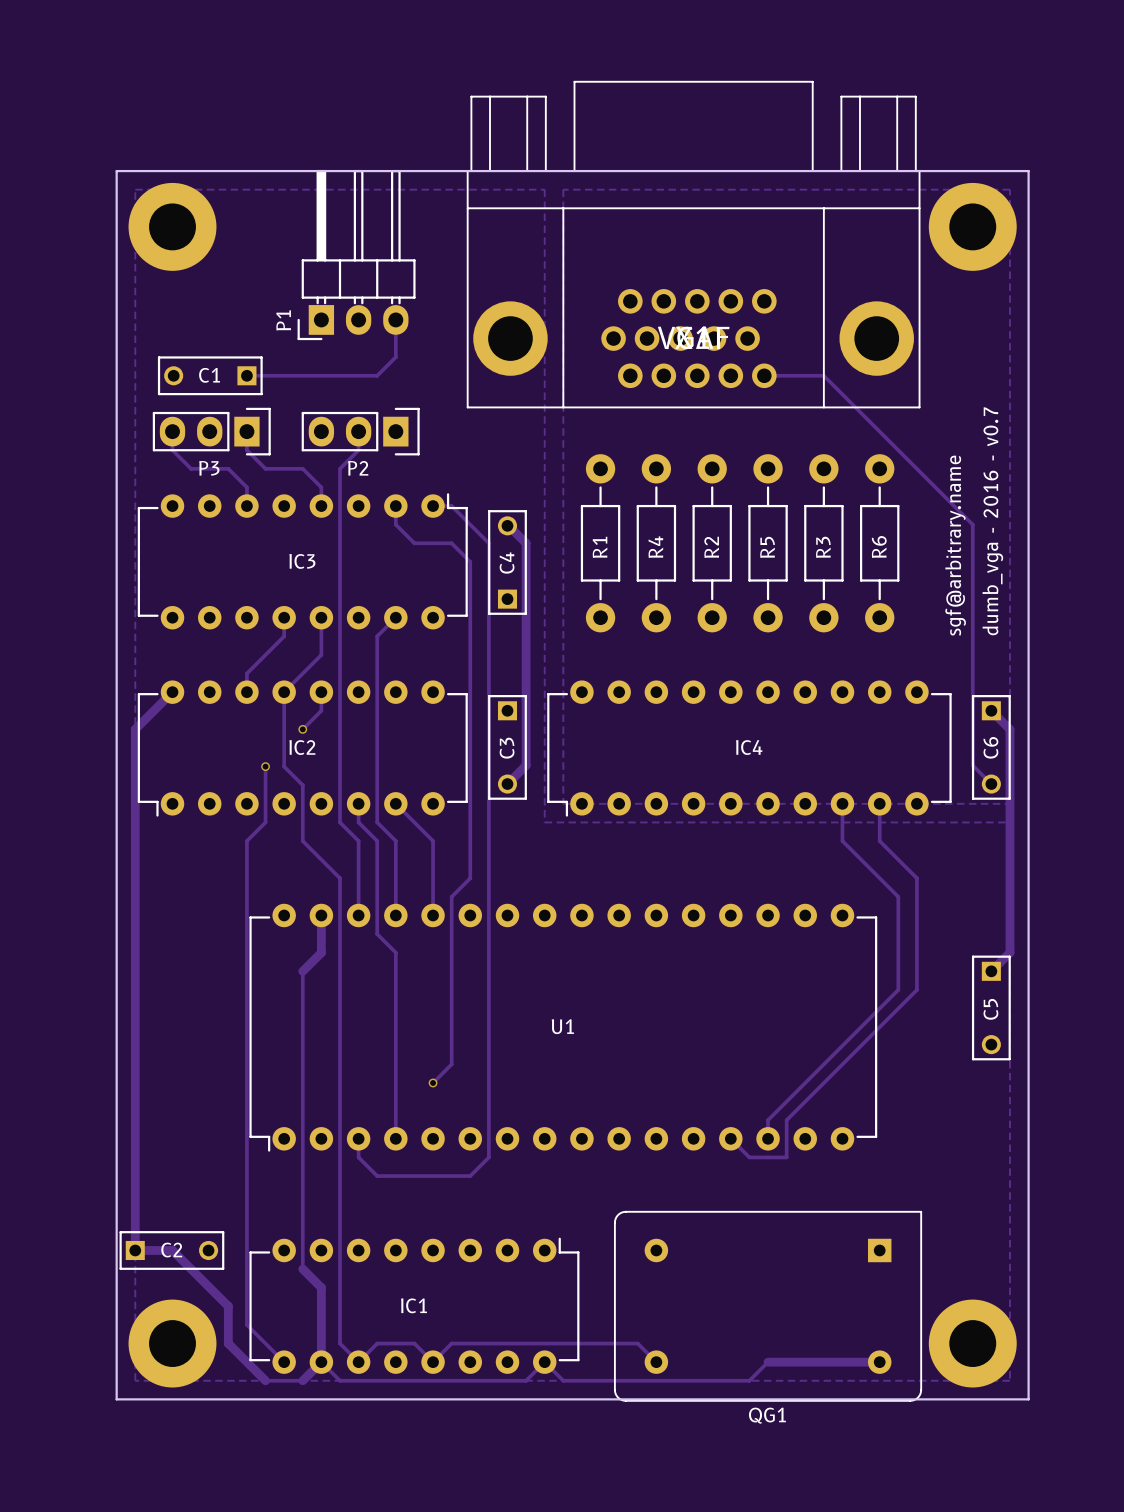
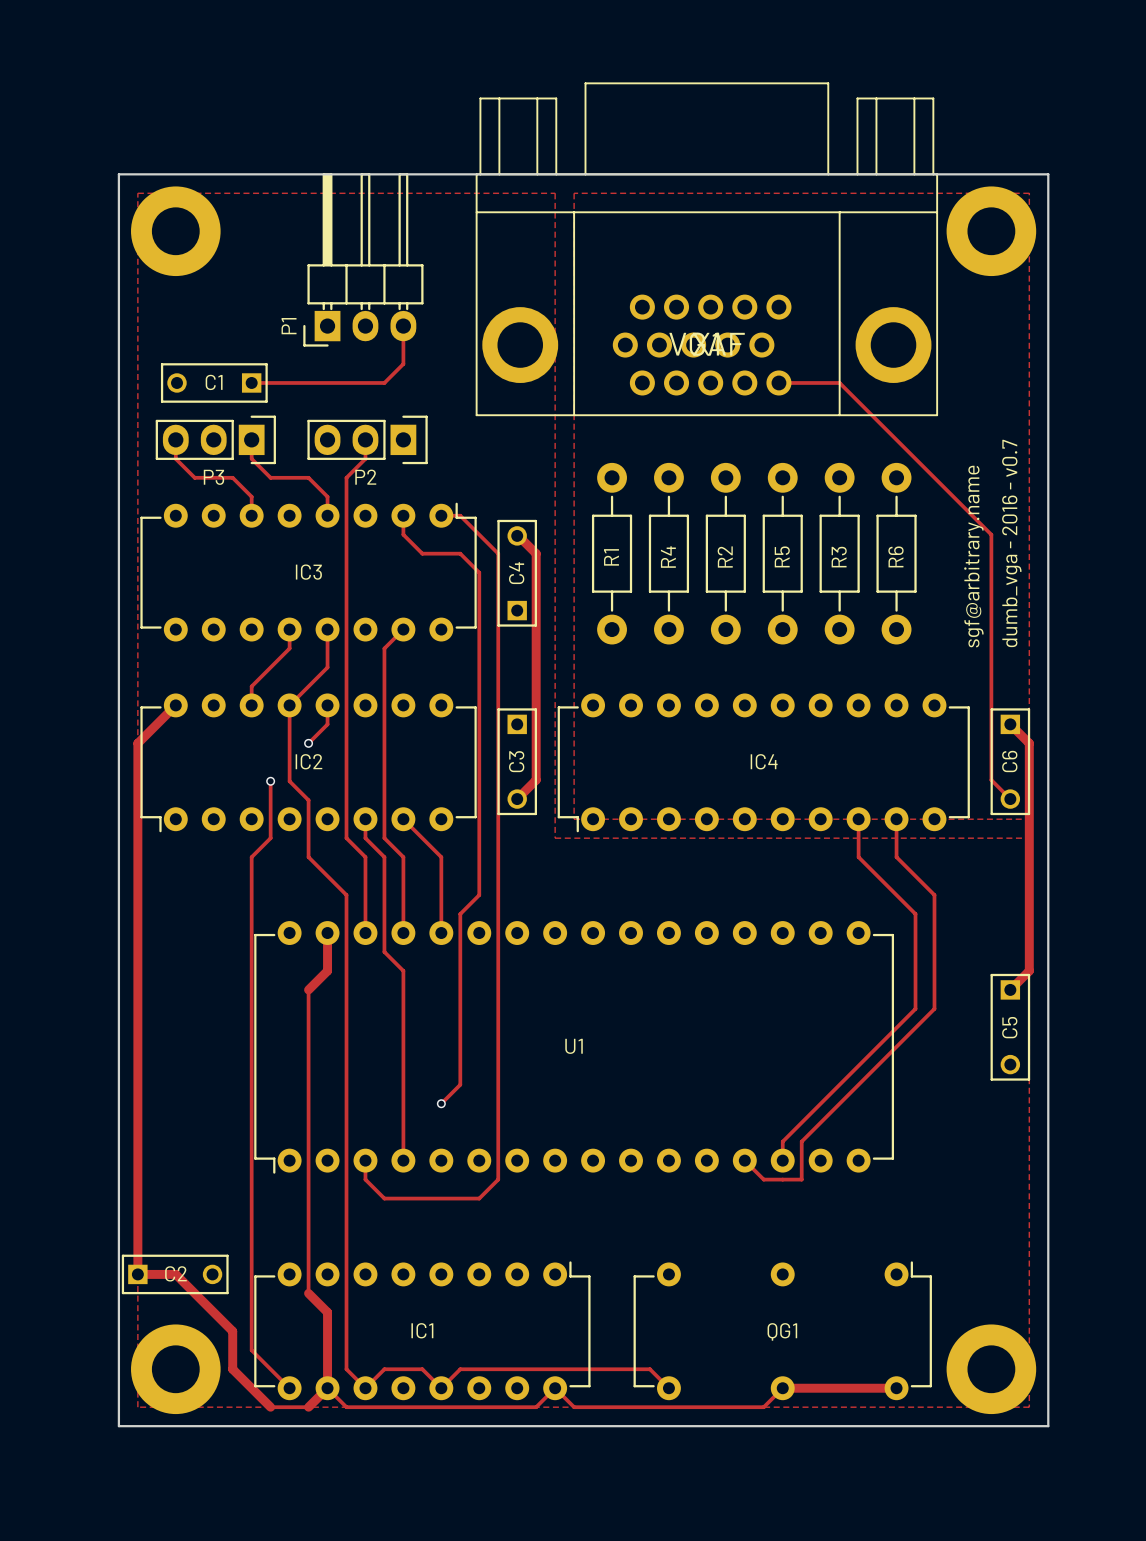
QG1 footprint: [614, 1210, 923, 1402] -> [633, 1261, 932, 1401]
QG1 name position: QG1 (767, 1415) -> QG1 (782, 1331)

